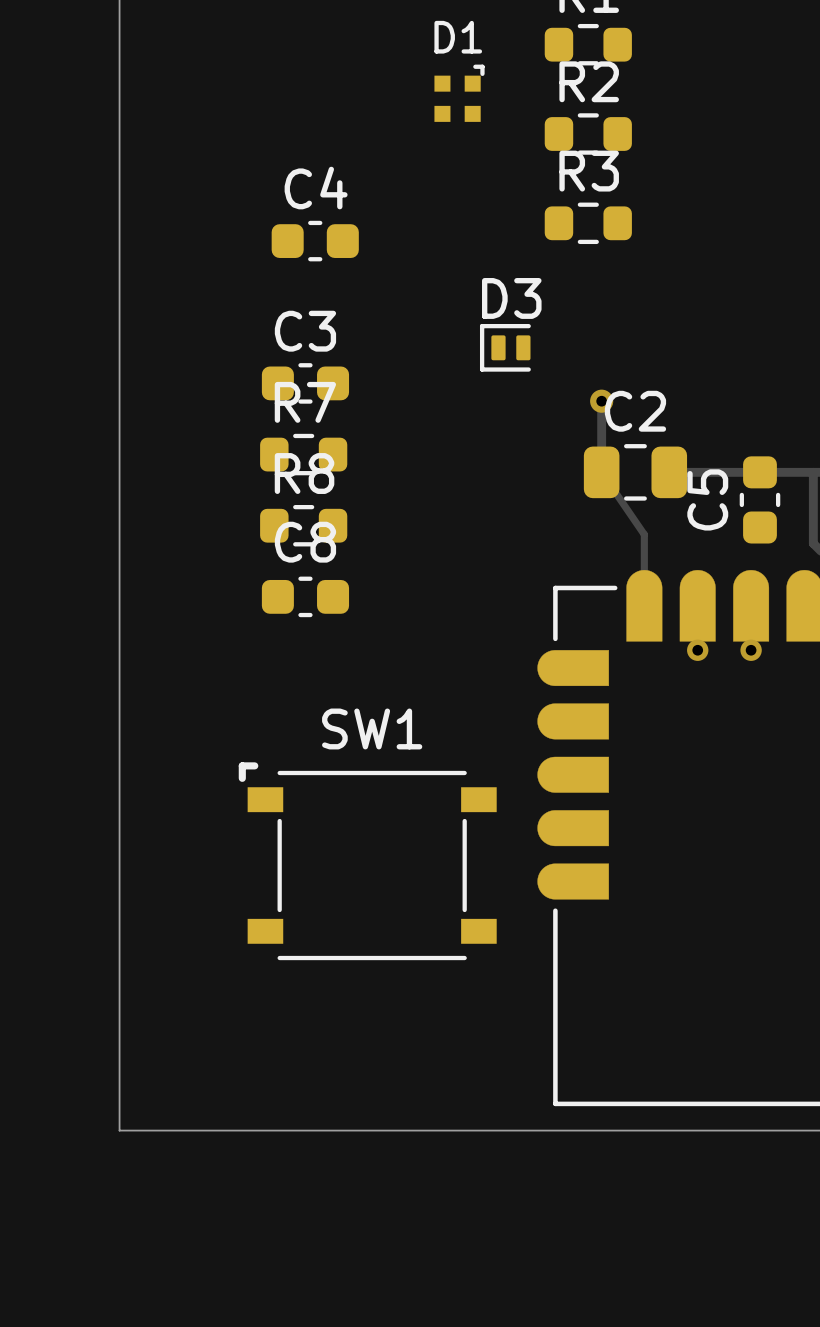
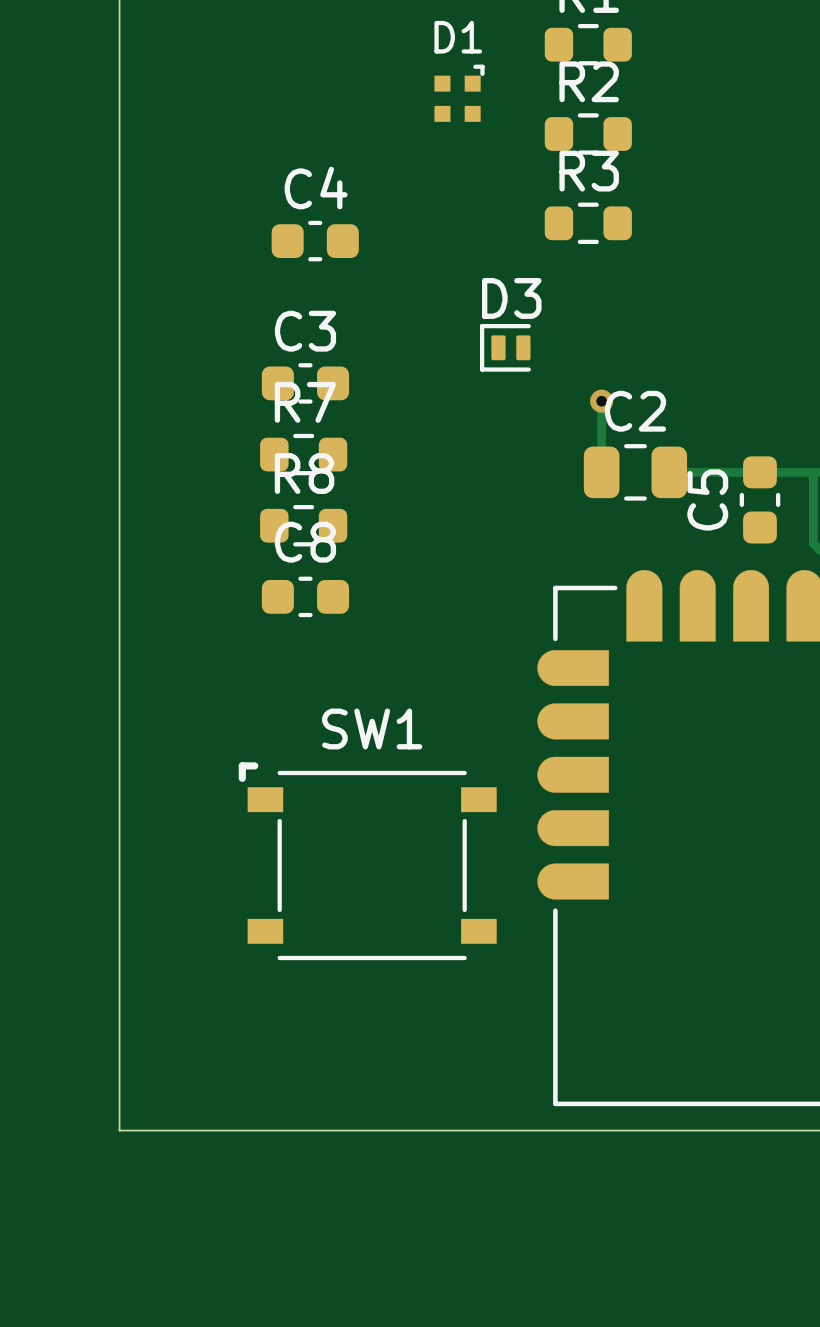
track: (601, 472) (644, 534) (644, 605) -> none
via: (697, 650) -> none
via: (751, 650) -> none

